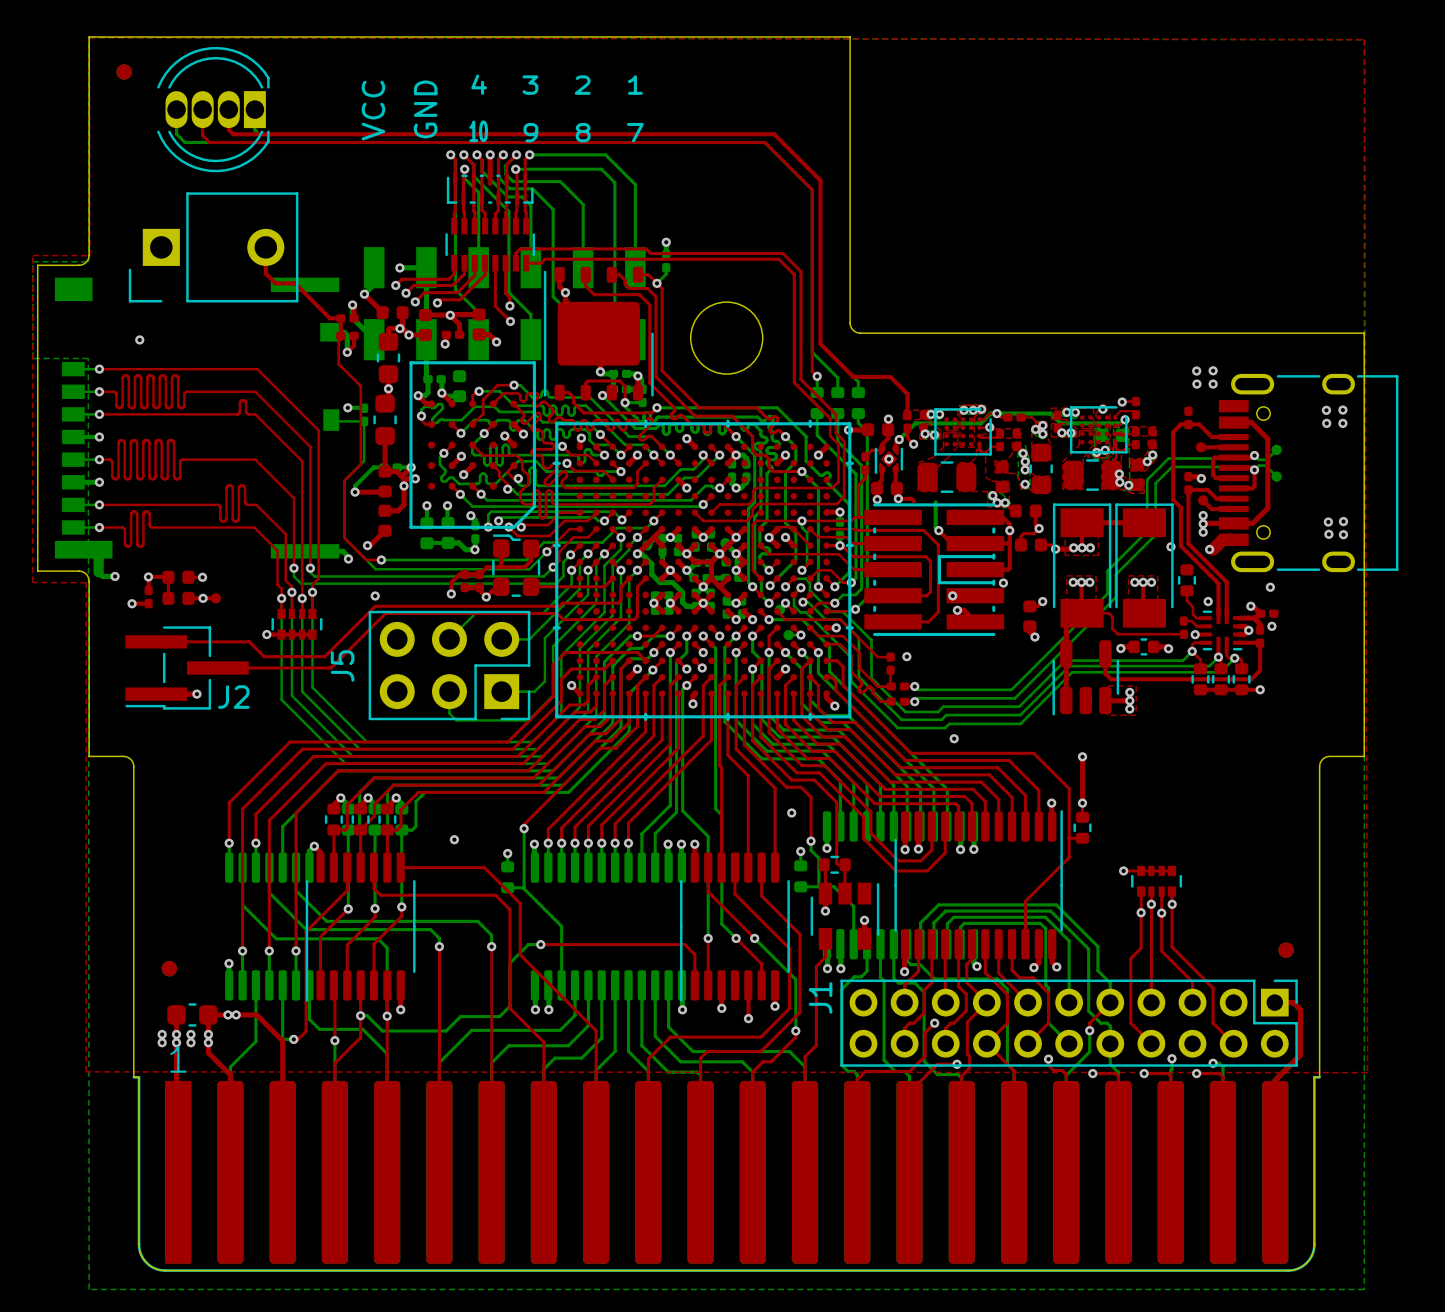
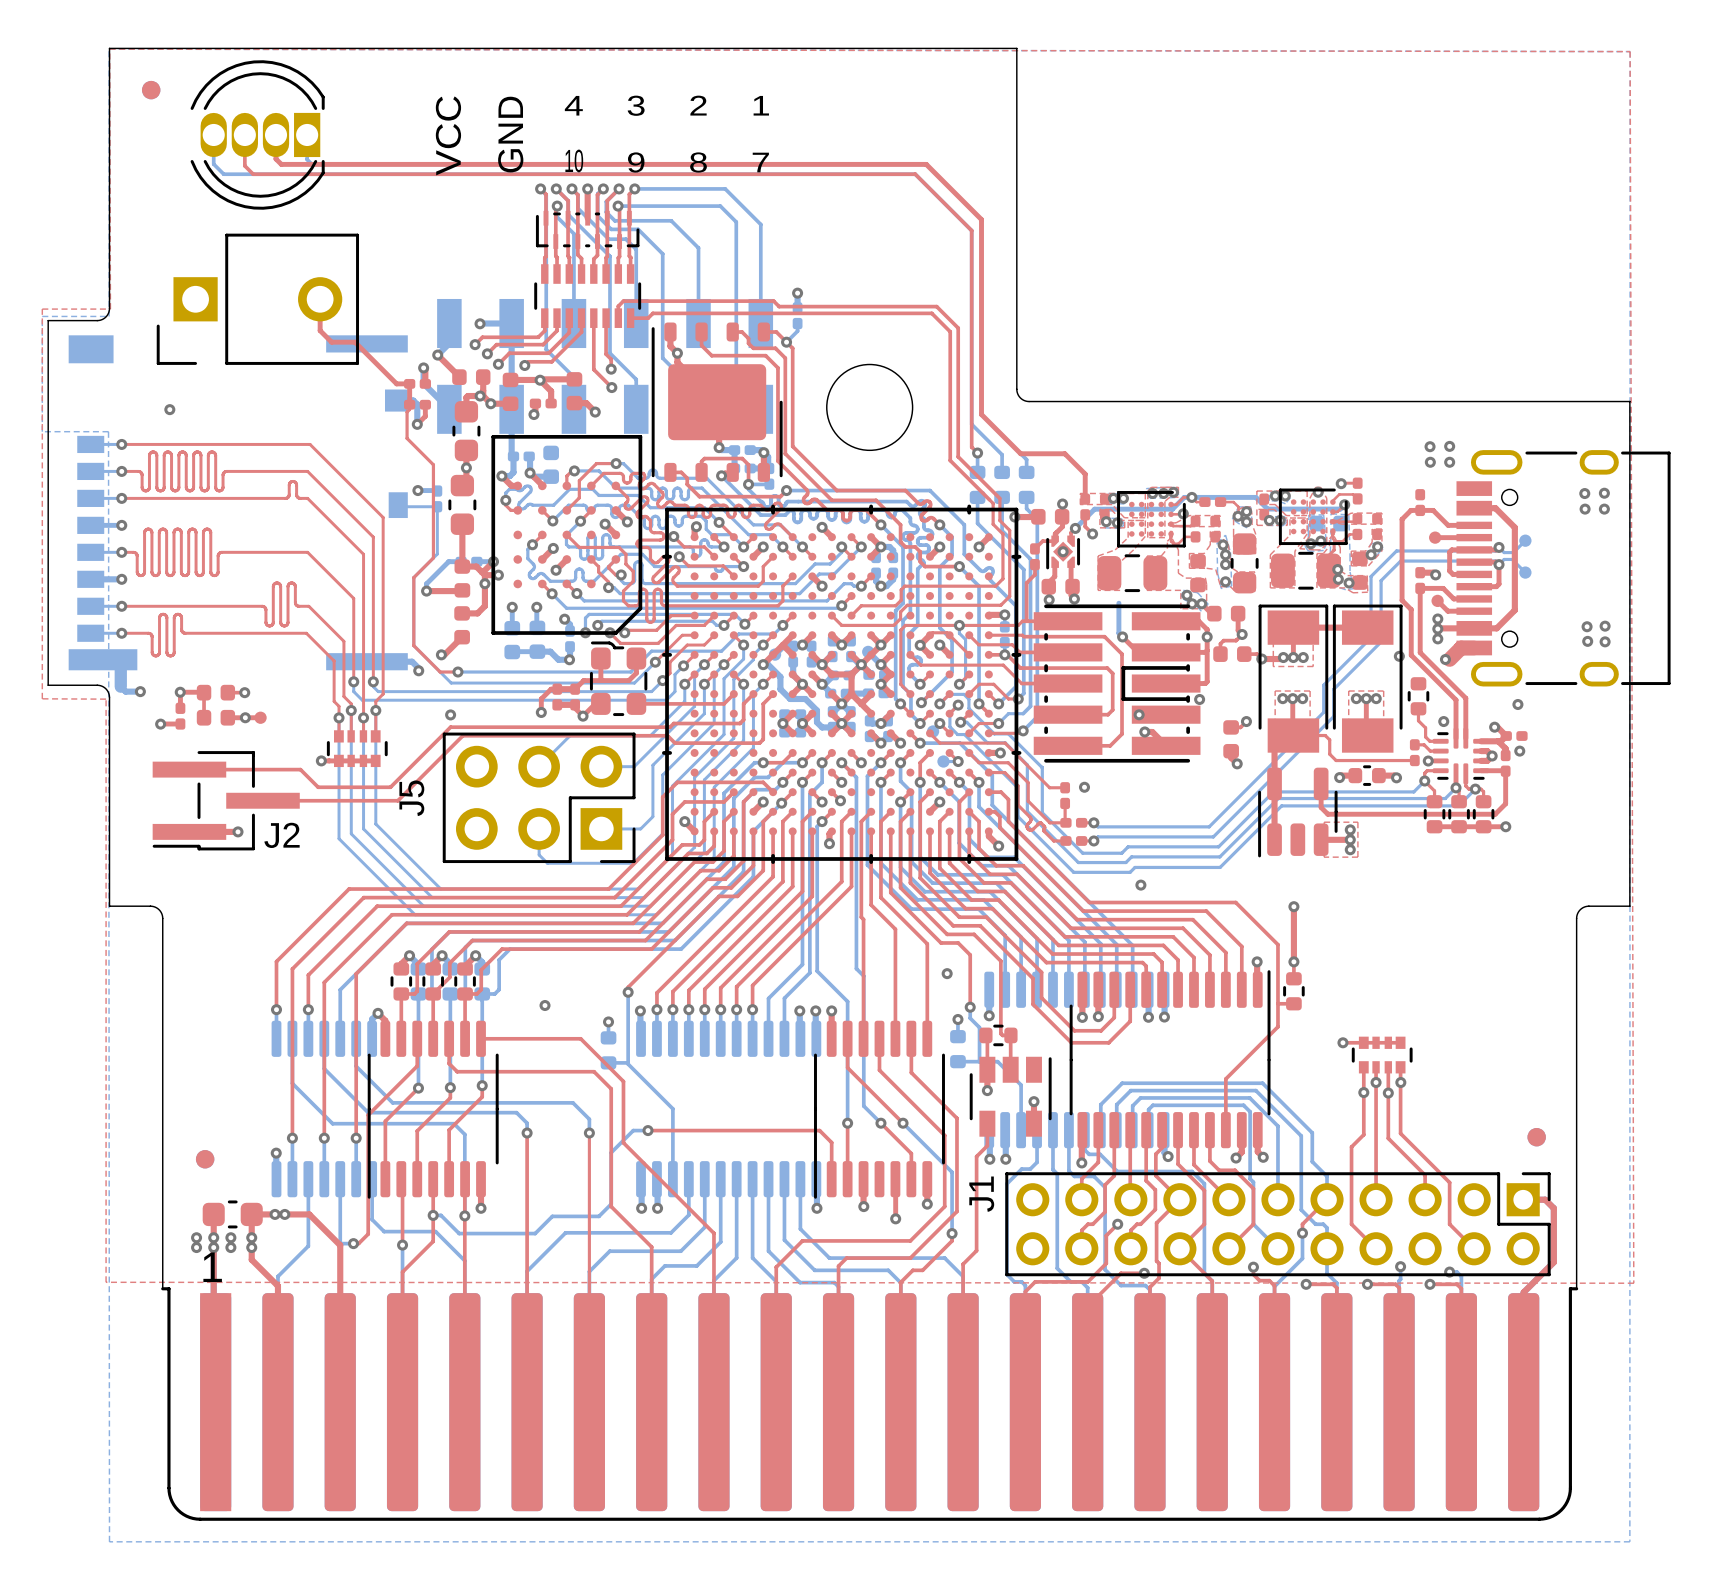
top track: (898, 498) (911, 498) (914, 501) -> none

